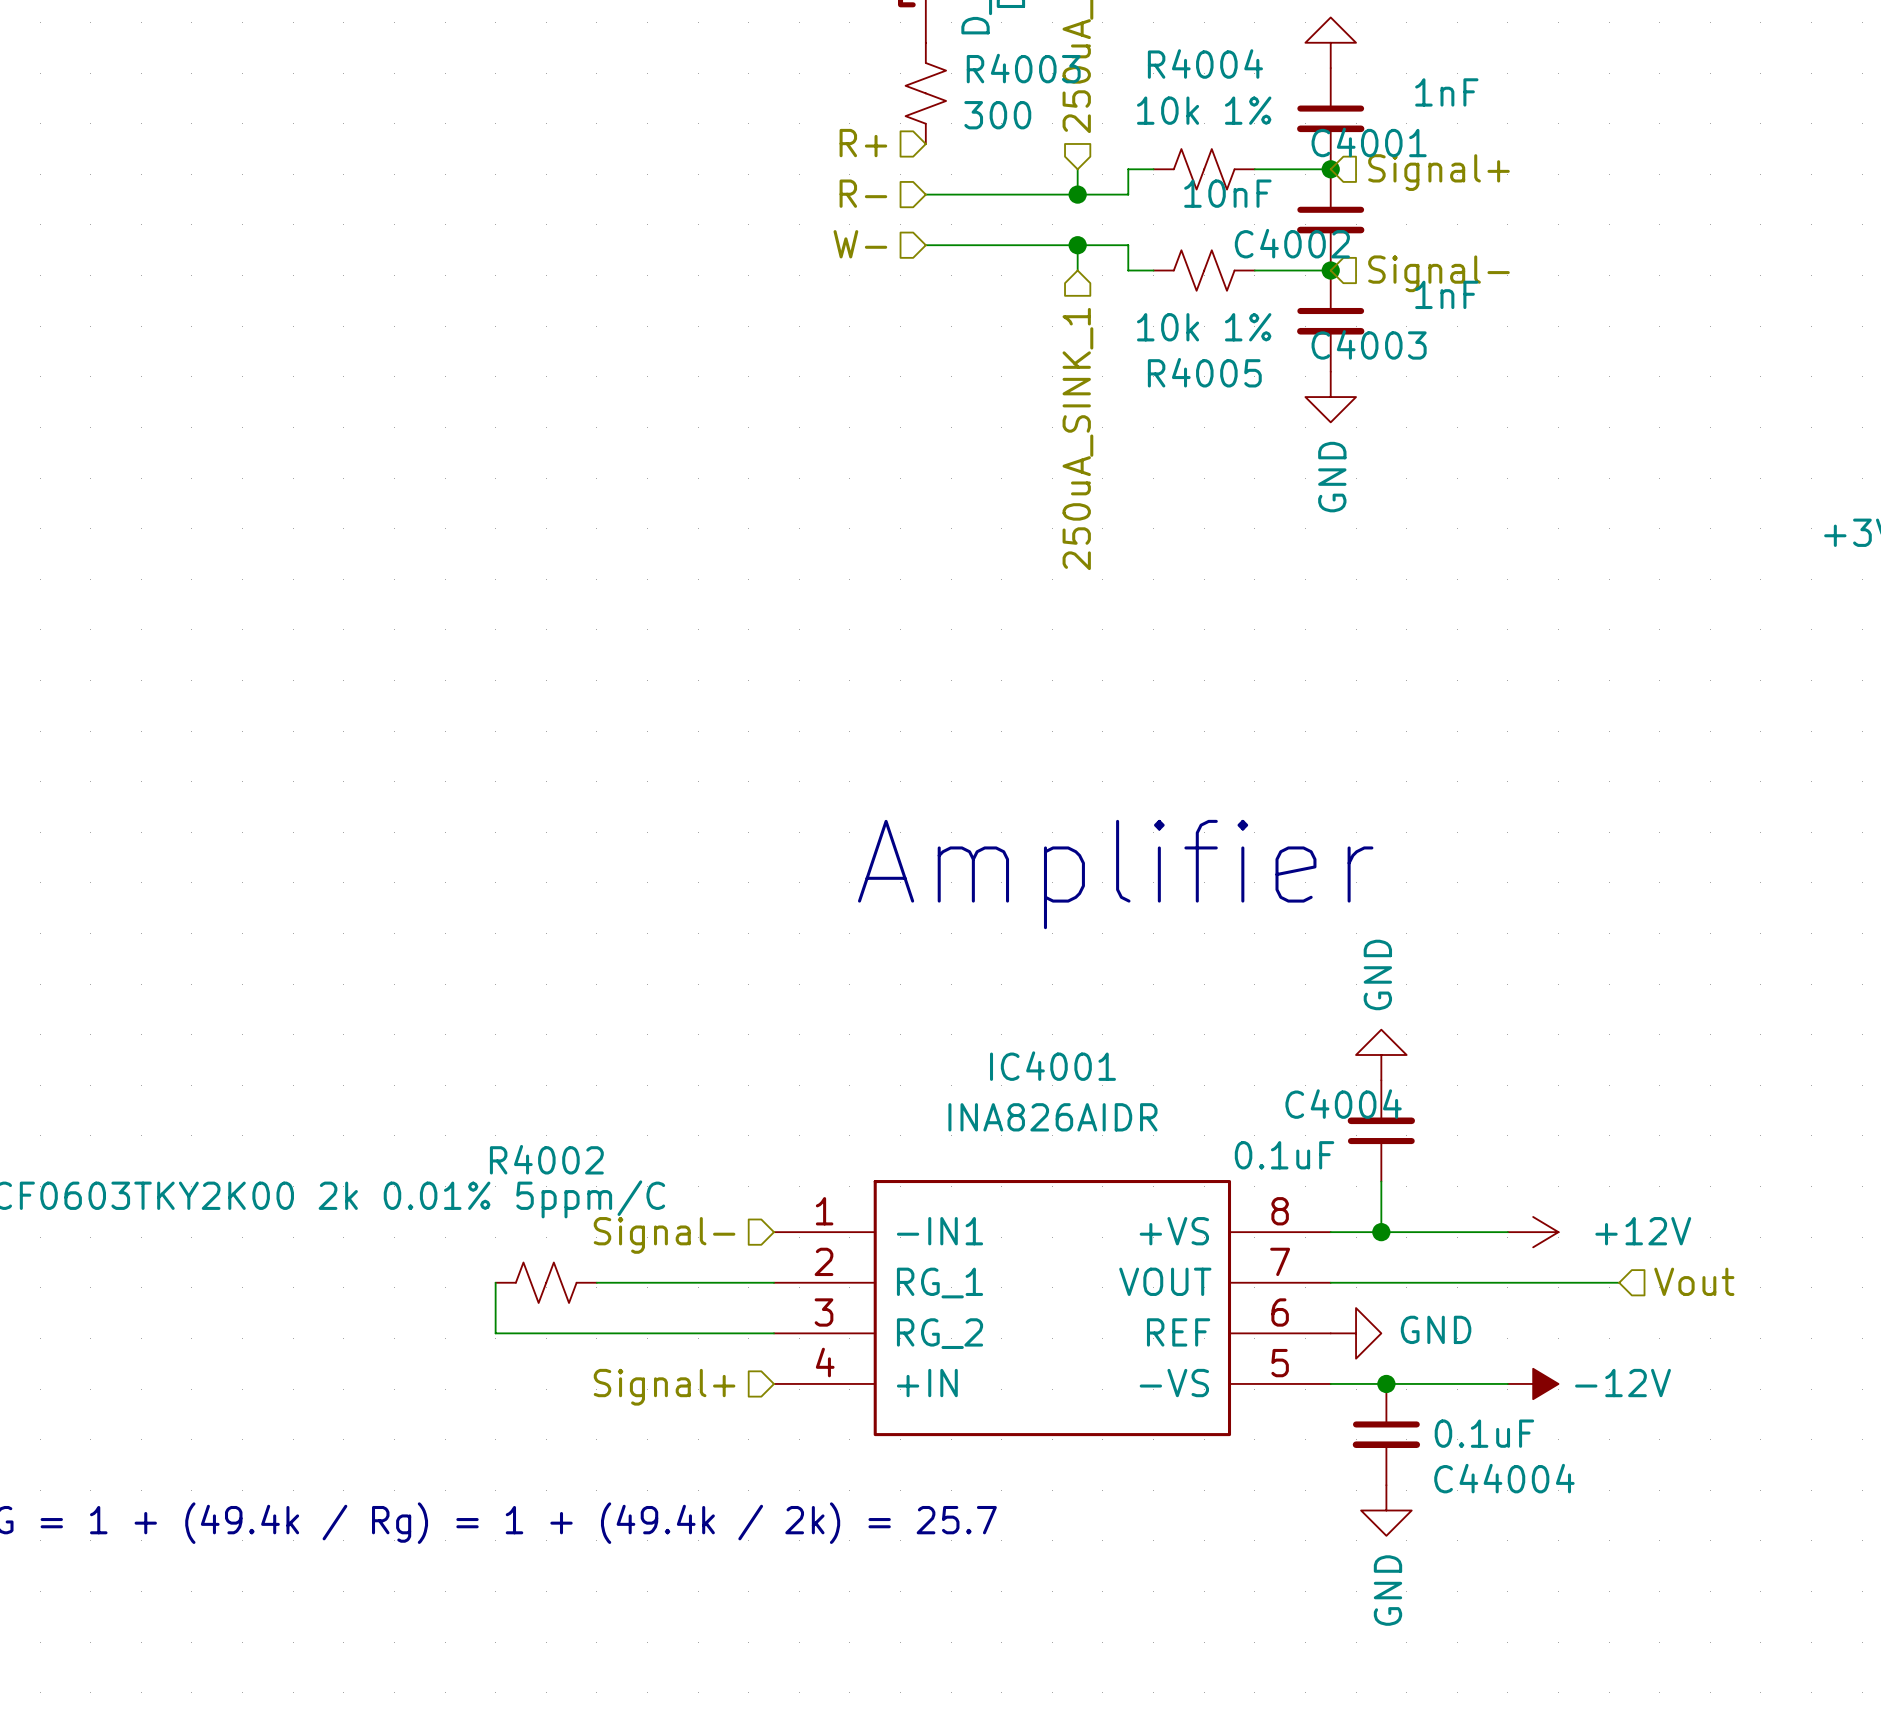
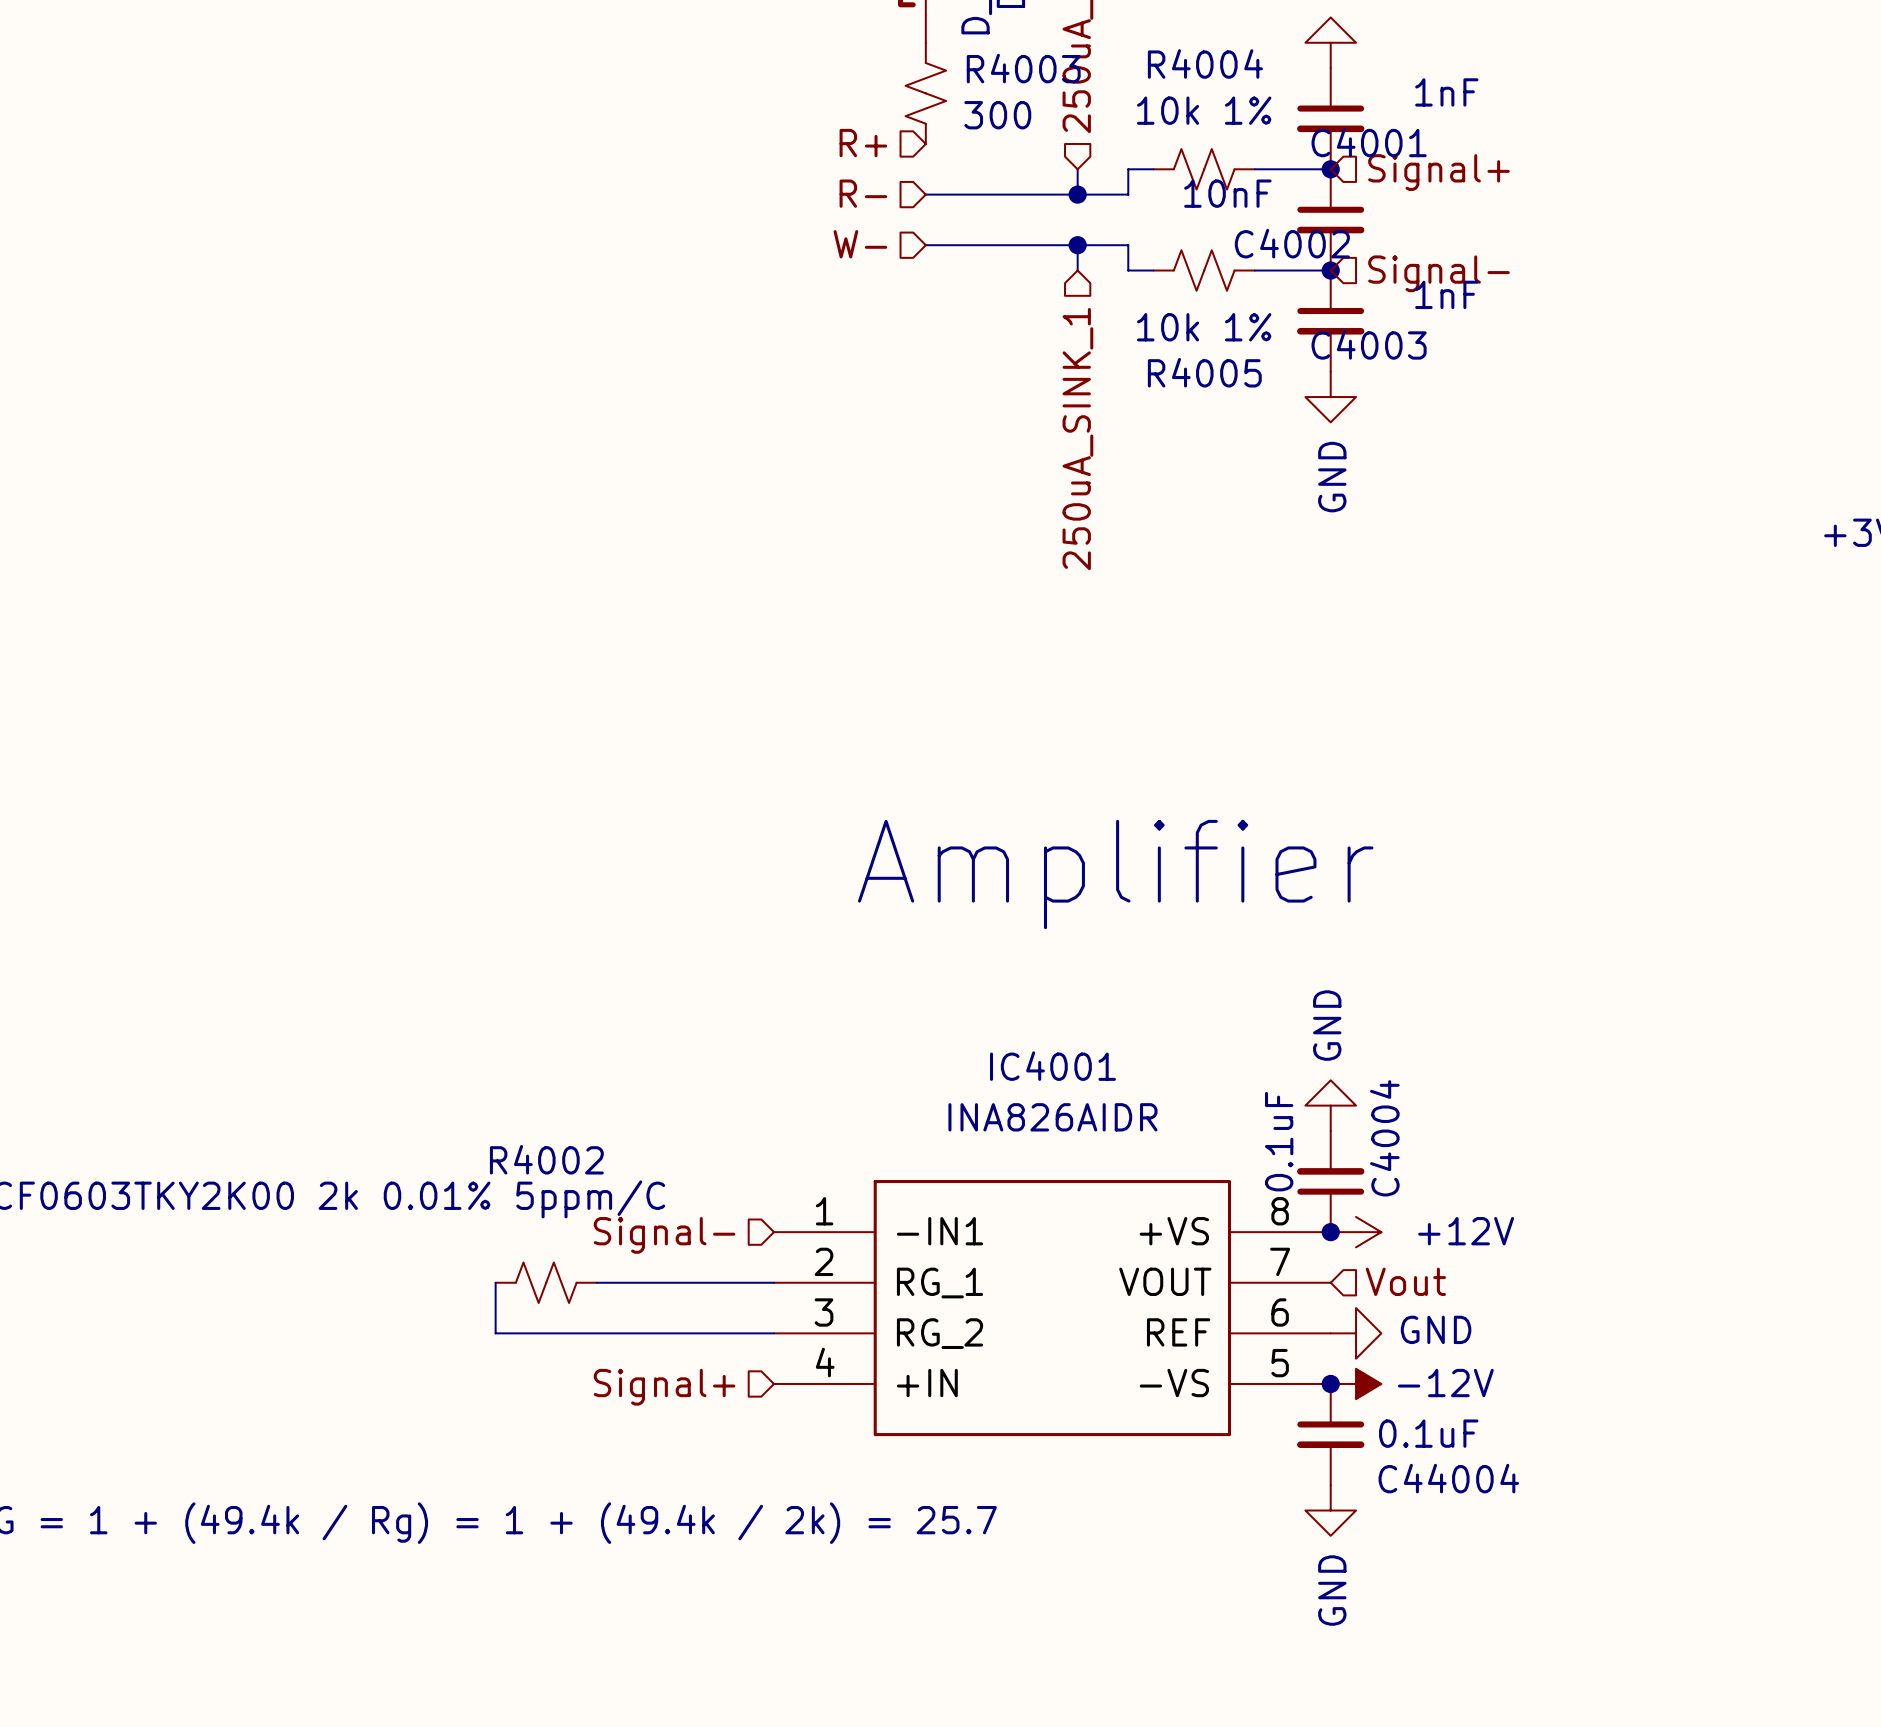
power symbol position: GND (1381, 1055) -> GND (1330, 1105)
C4004 name rotation: 0° (1343, 1104) -> 90° counterclockwise (1384, 1138)
C4004 position: (1381, 1130) -> (1330, 1181)
C4004 value rotation: 0° (1284, 1155) -> 90° counterclockwise (1279, 1141)
wire: (1381, 1181) (1381, 1232) -> none
wire: (1330, 1232) (1507, 1232) -> none
junction position: (1381, 1232) -> (1330, 1232)
power symbol position: +12V (1533, 1232) -> +12V (1356, 1232)
hierarchical label position: Vout (1694, 1281) -> Vout (1405, 1281)
wire: (1330, 1282) (1619, 1282) -> none
wire: (1330, 1383) (1507, 1383) -> none
junction position: (1386, 1383) -> (1330, 1383)
power symbol position: -12V (1533, 1383) -> -12V (1356, 1383)
C44004 position: (1386, 1434) -> (1330, 1434)
power symbol position: GND (1386, 1510) -> GND (1330, 1510)

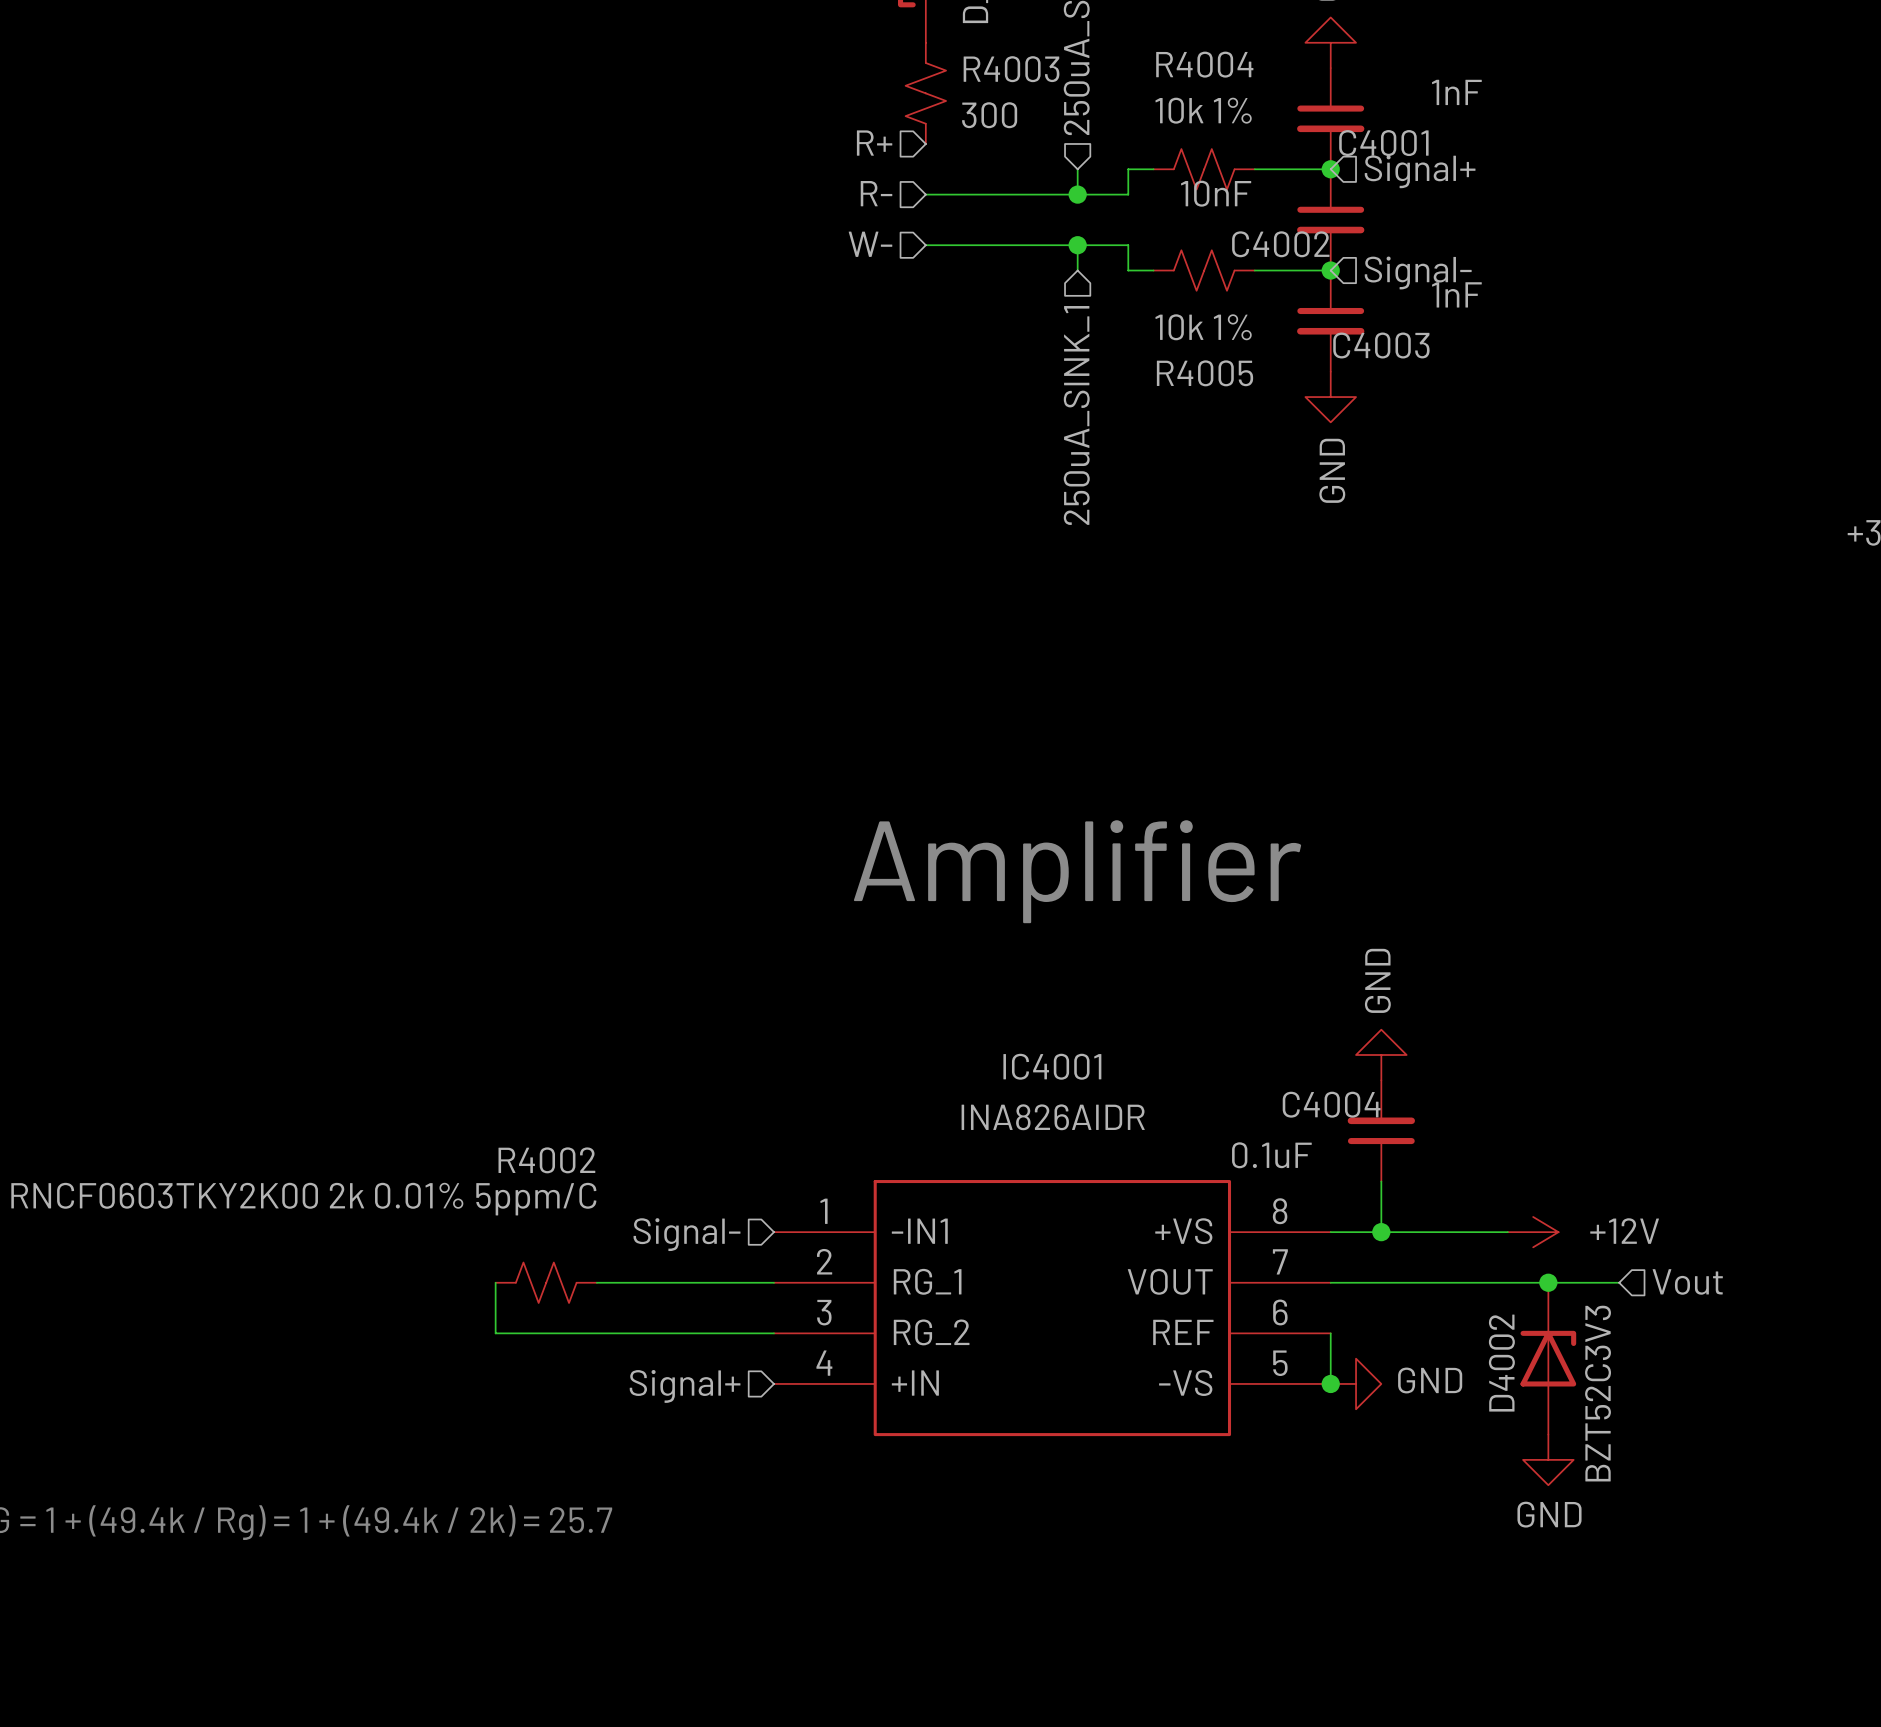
power symbol position: GND (1330, 1105) -> GND (1381, 1055)
C4004 name rotation: 0° (1384, 1138) -> 90° clockwise (1331, 1104)
C4004 value rotation: 0° (1279, 1141) -> 90° clockwise (1271, 1155)
C4004 position: (1330, 1181) -> (1381, 1130)
wire: none -> (1381, 1181) (1381, 1232)
wire: none -> (1330, 1232) (1507, 1232)
junction position: (1330, 1232) -> (1381, 1232)
power symbol position: +12V (1356, 1232) -> +12V (1533, 1232)
hierarchical label position: Vout (1405, 1281) -> Vout (1687, 1281)
wire: none -> (1330, 1282) (1619, 1282)
junction: none -> (1548, 1282)
wire: none -> (1330, 1333) (1330, 1383)
power symbol: GND (1356, 1333) -> none
D4002: none -> BZT52C3V3 (1548, 1358)
power symbol: -12V (1356, 1383) -> GND (1356, 1383)
C44004: 0.1uF (1330, 1434) -> none
power symbol: none -> GND (1548, 1459)
power symbol: GND (1330, 1510) -> none

